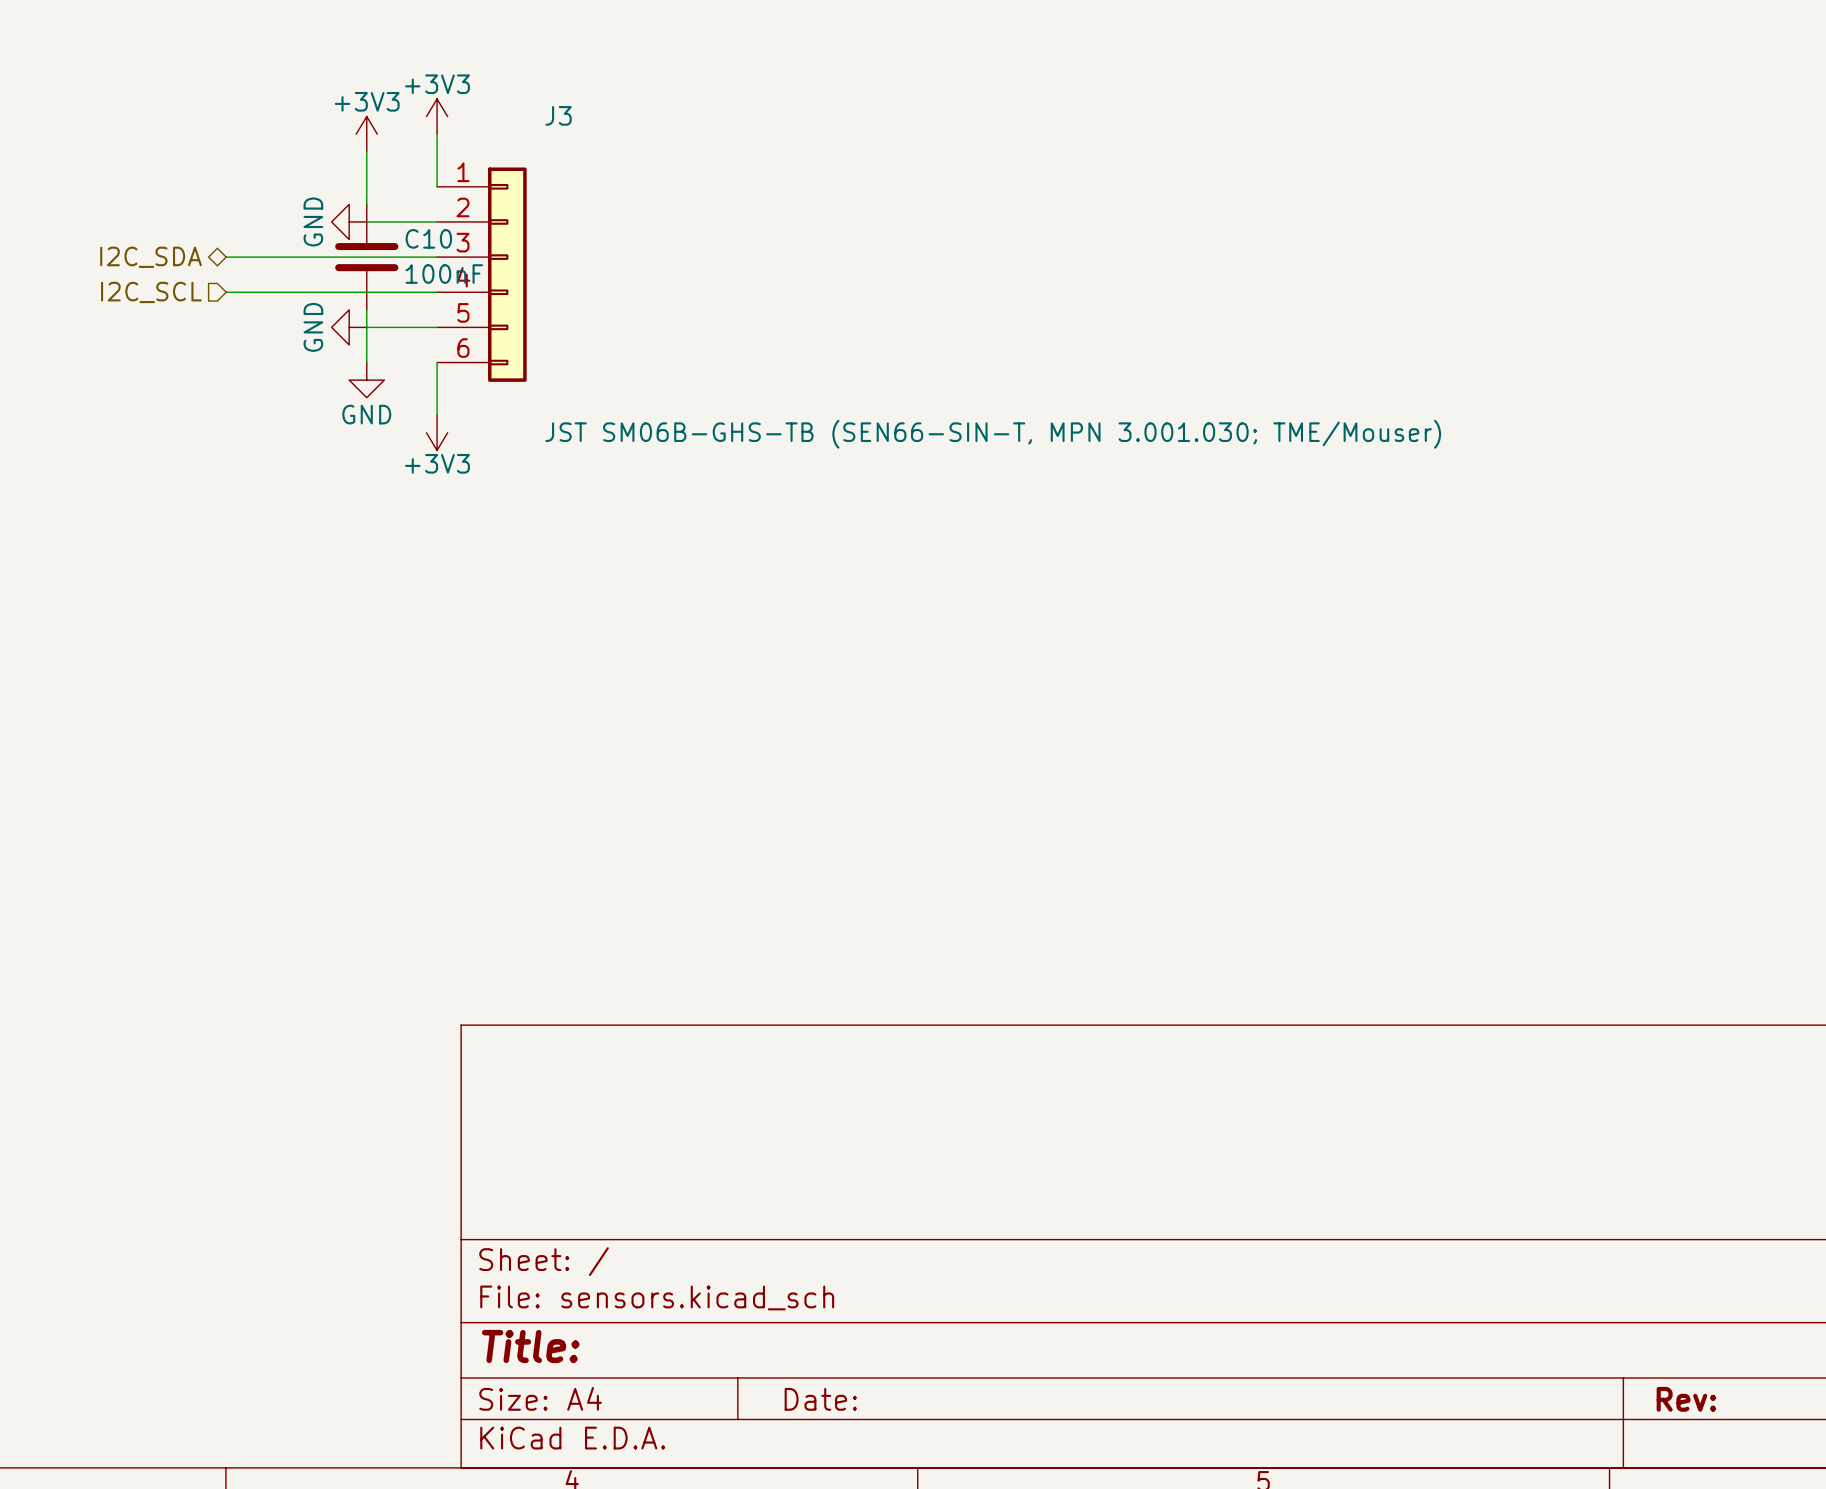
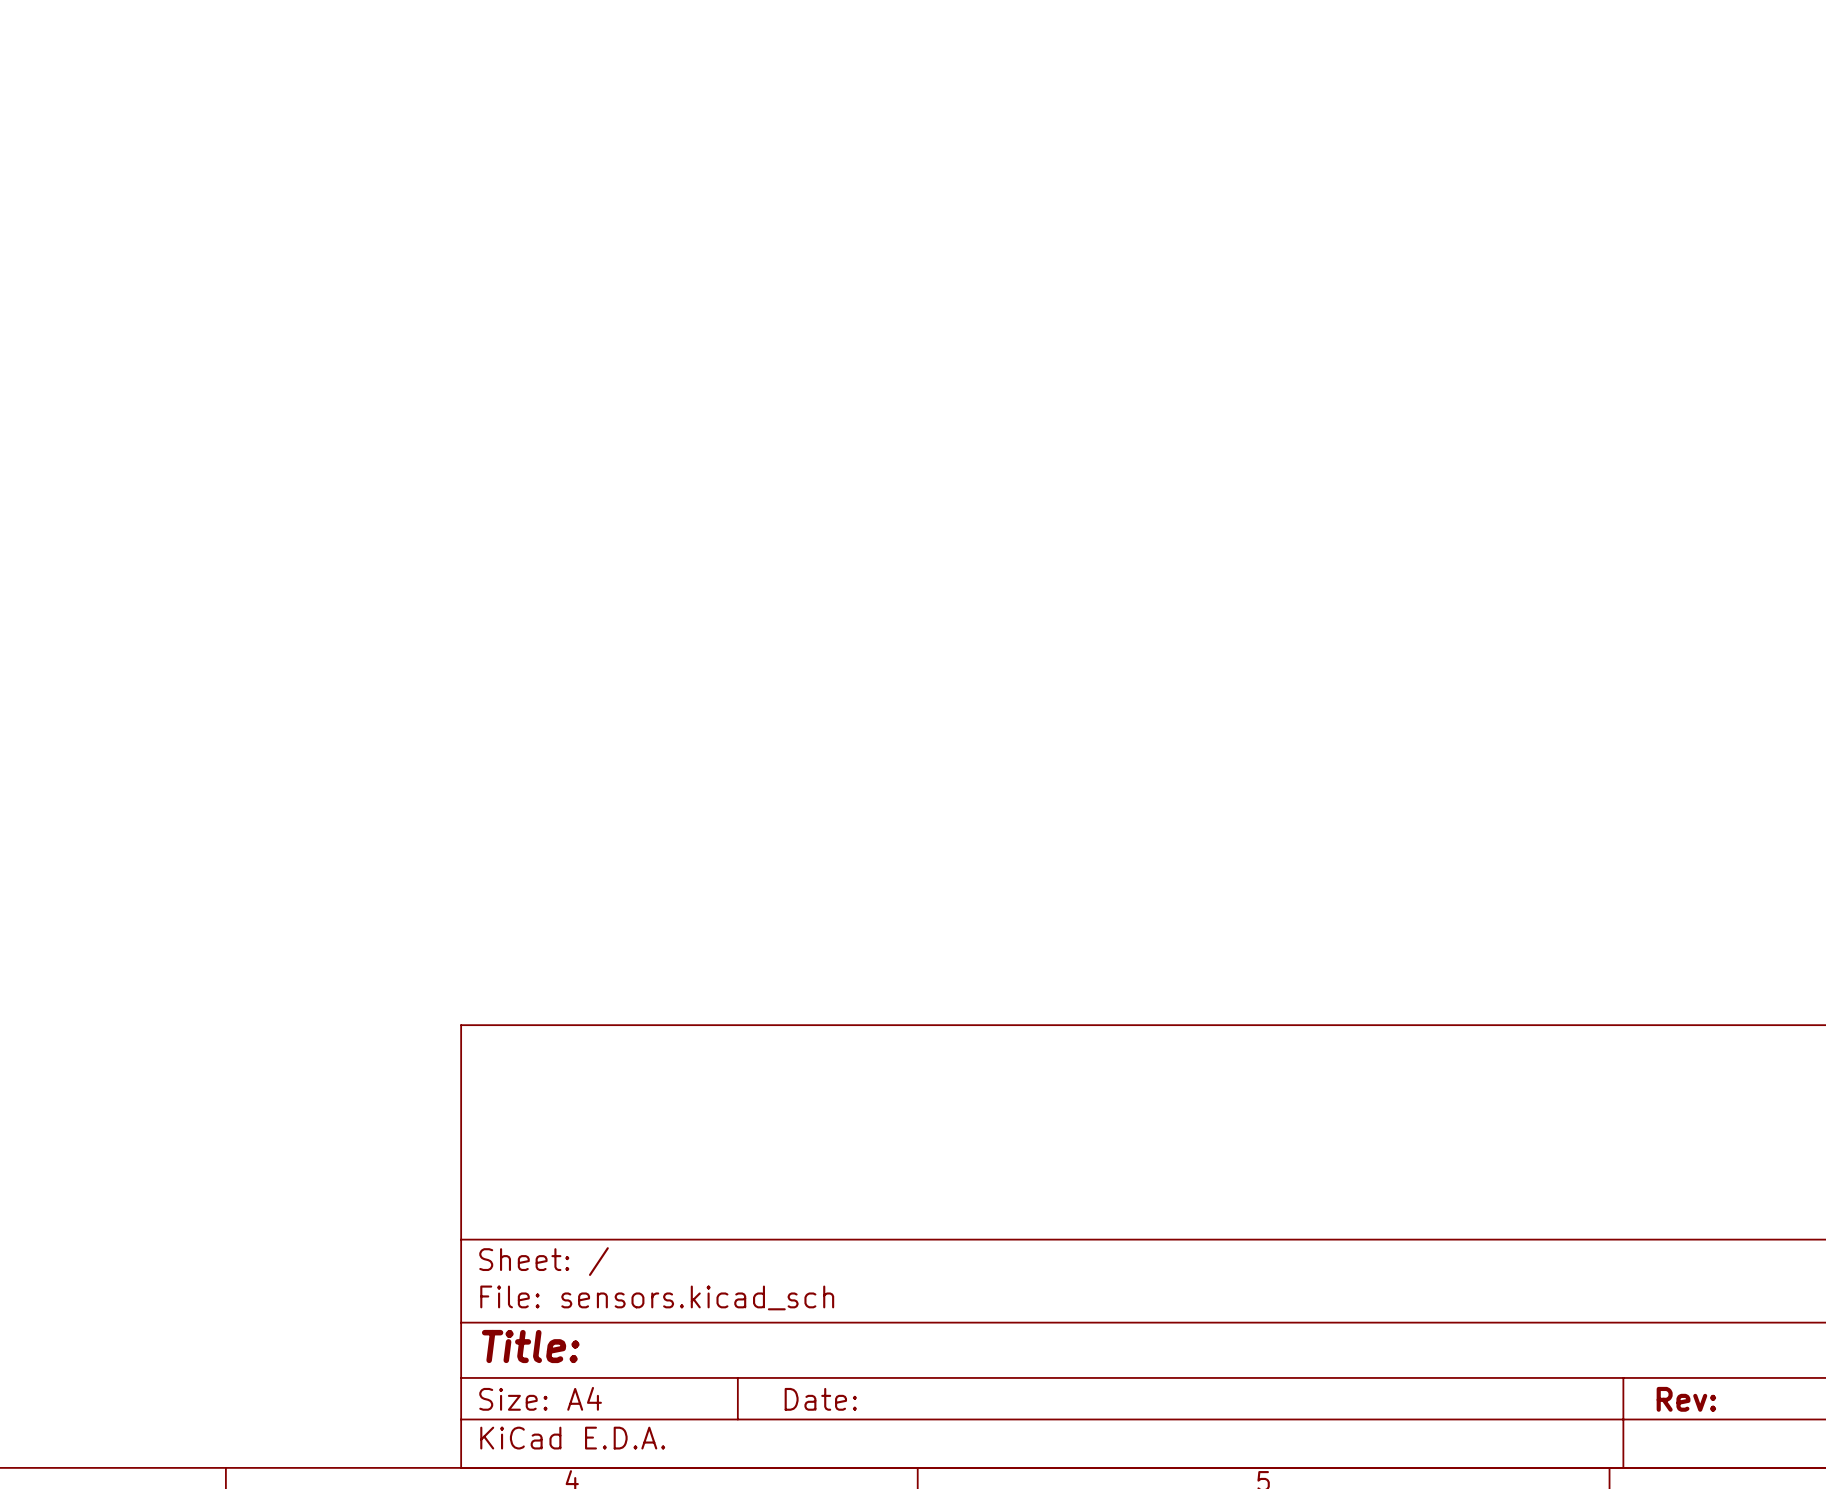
power symbol: +3V3 (437, 116) -> none
power symbol: +3V3 (366, 134) -> none
wire: (437, 134) (437, 186) -> none
wire: (366, 151) (366, 204) -> none
power symbol: GND (349, 221) -> none
wire: (366, 221) (437, 221) -> none
hierarchical label: I2C_SDA (151, 257) -> none
wire: (226, 257) (437, 257) -> none
C10: 100nF (366, 257) -> none
J3: JST SM06B-GHS-TB (SEN66-SIN-T, MPN 3.001.030; TME/Mouser) (481, 274) -> none
hierarchical label: I2C_SCL (151, 292) -> none
wire: (226, 292) (437, 292) -> none
wire: (366, 309) (366, 362) -> none
power symbol: GND (349, 327) -> none
wire: (366, 327) (437, 327) -> none
wire: (437, 362) (437, 415) -> none
power symbol: GND (366, 380) -> none
power symbol: +3V3 (437, 432) -> none

